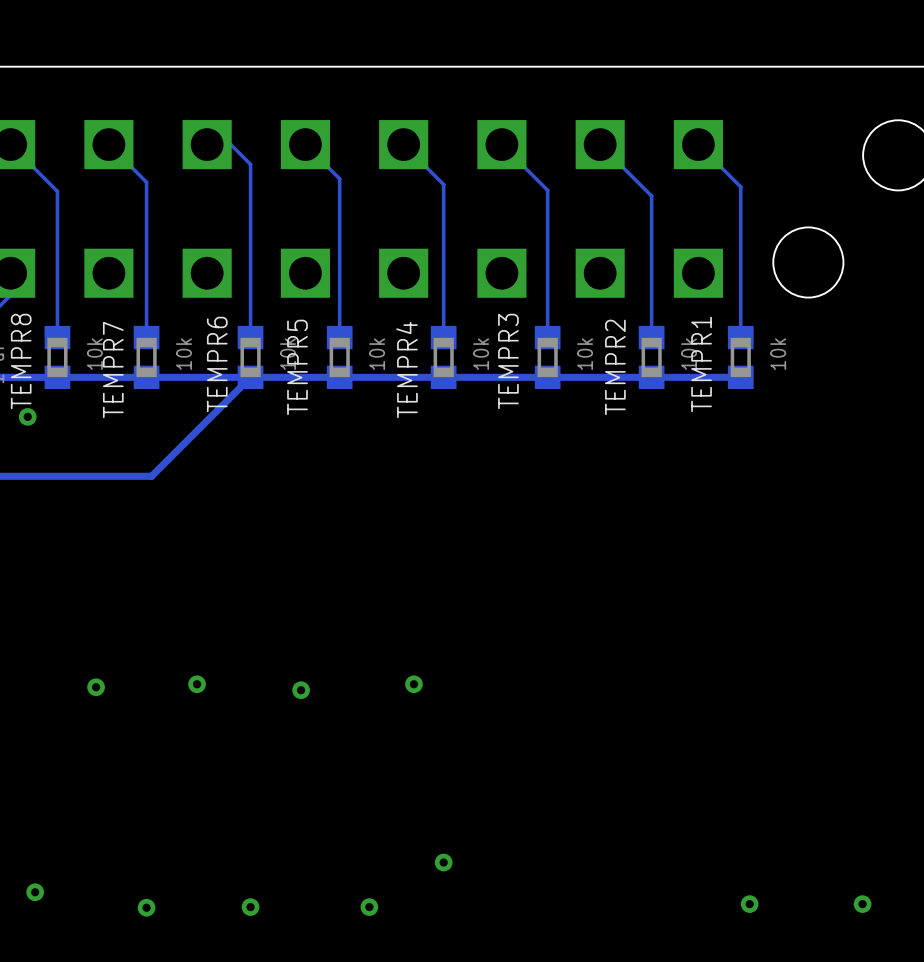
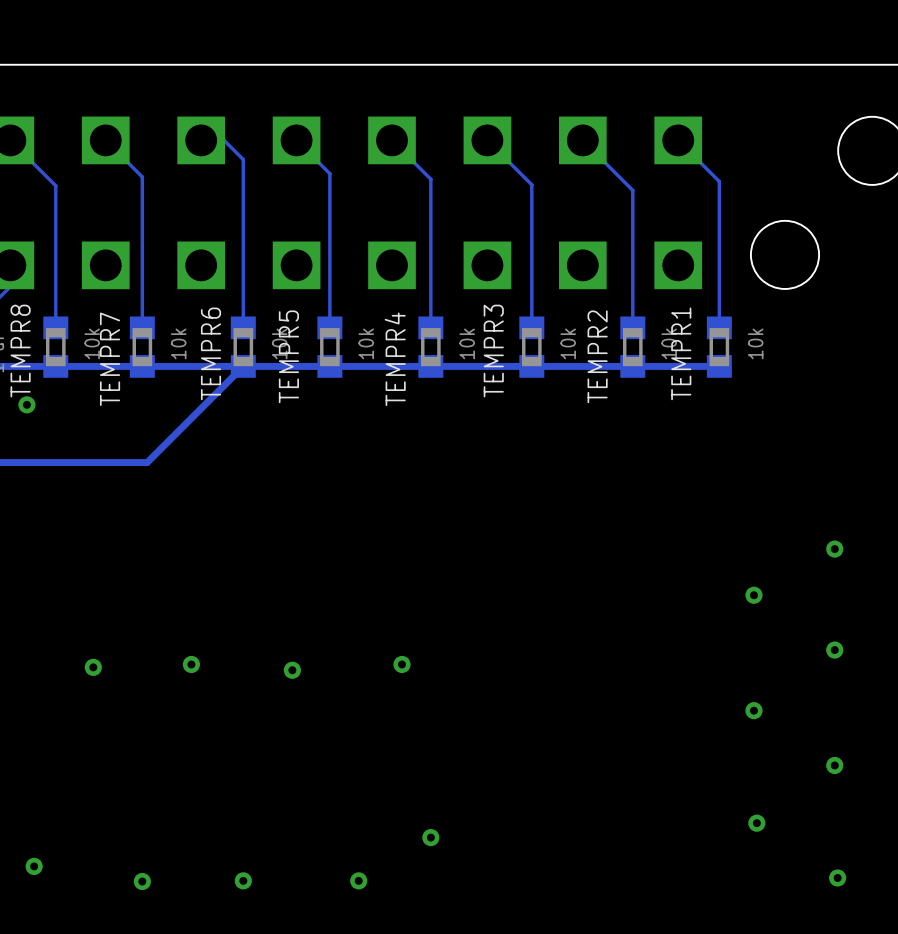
via: none -> (834, 549)
via: none -> (753, 595)
via: none -> (834, 650)
via: none -> (753, 710)
via: none -> (834, 765)
via: none -> (756, 823)
via: (749, 904) -> none

